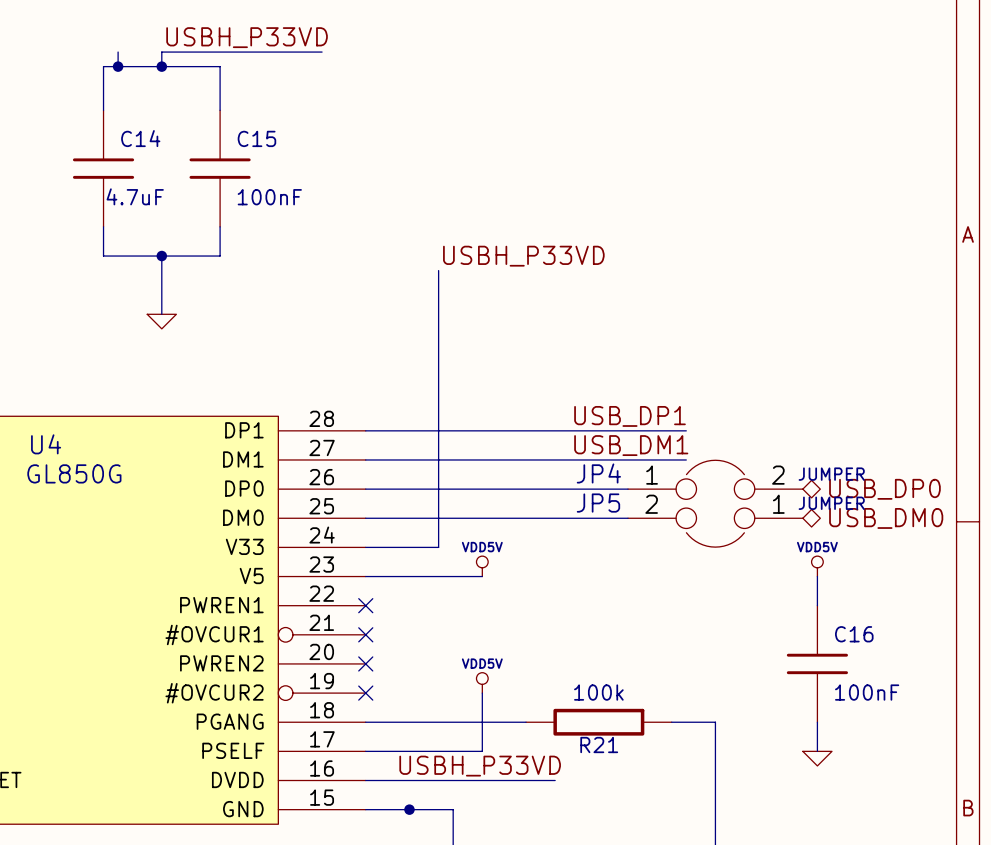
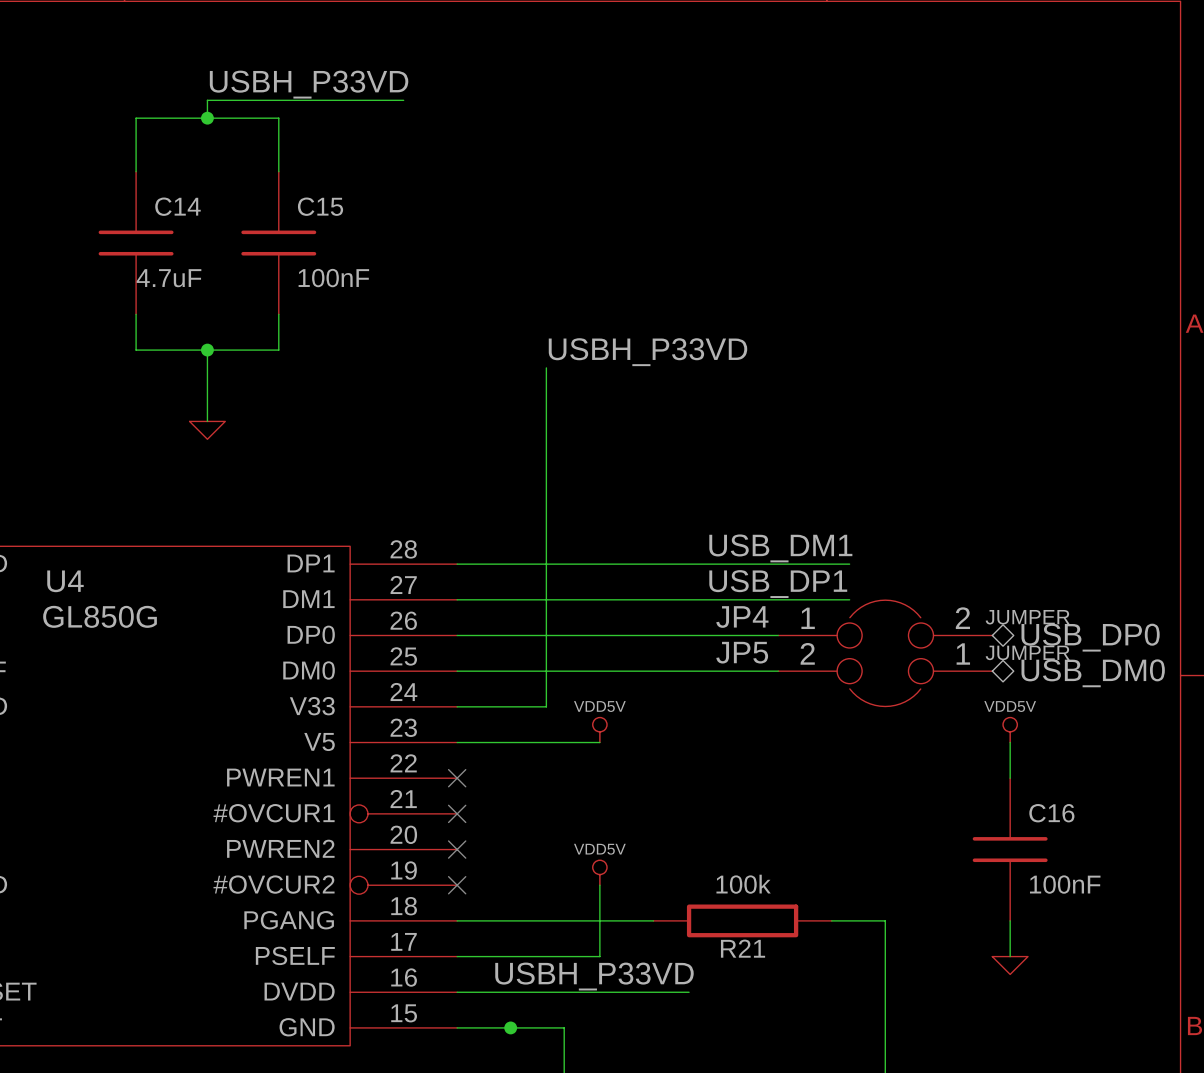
wire: (118, 52) (118, 66) -> none
junction: (118, 66) -> none
label: USB_DP1 (629, 416) -> USB_DM1 (780, 548)
label: USB_DM1 (631, 445) -> USB_DP1 (778, 584)

